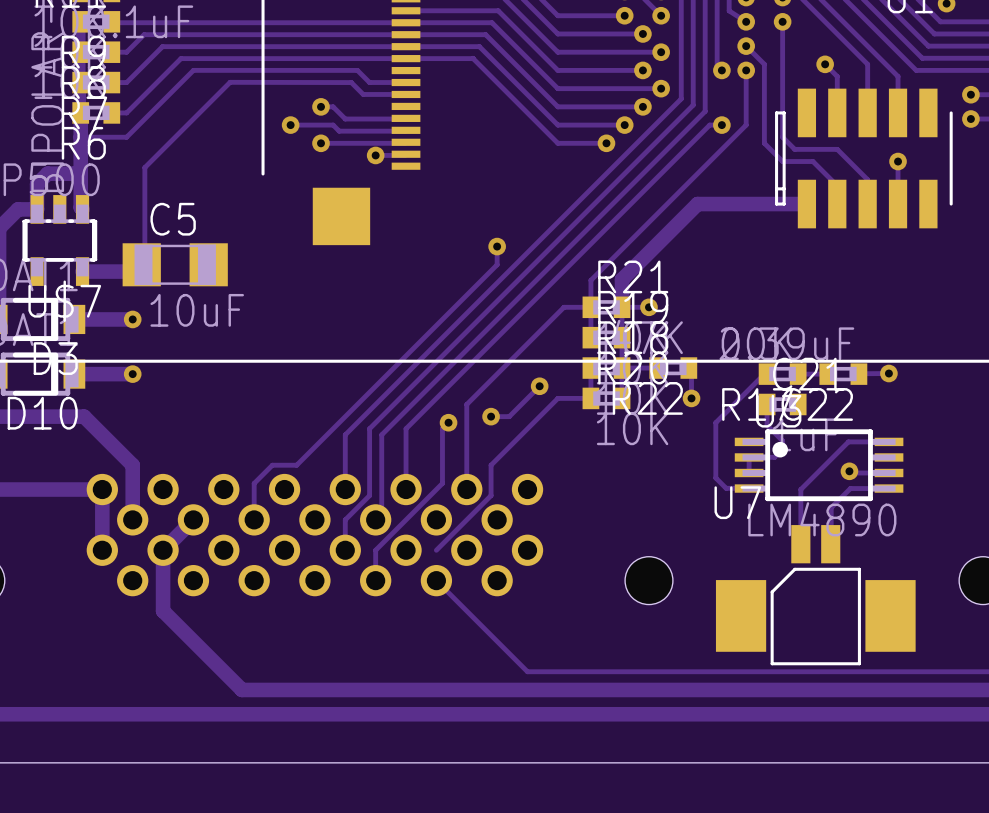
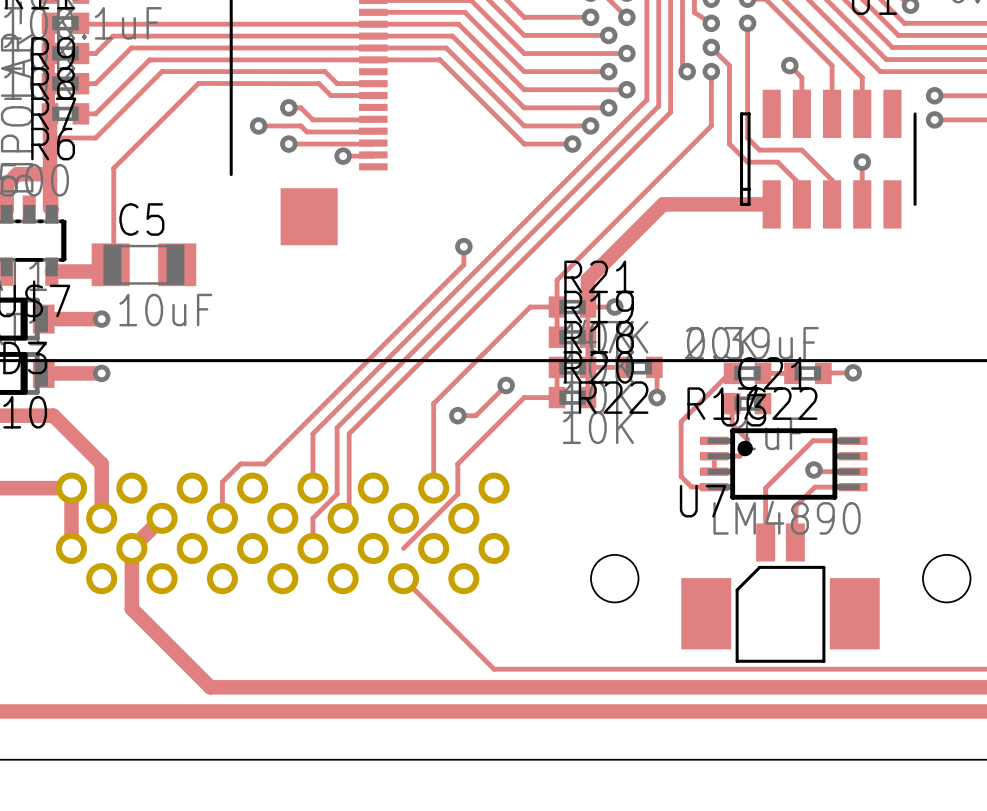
track: (721, 125) (709, 125) (406, 428) (406, 489) -> none
via: (721, 125) -> none
track: (448, 422) (442, 428) (442, 483) (375, 550) (375, 580) -> none
via: (448, 422) -> none

